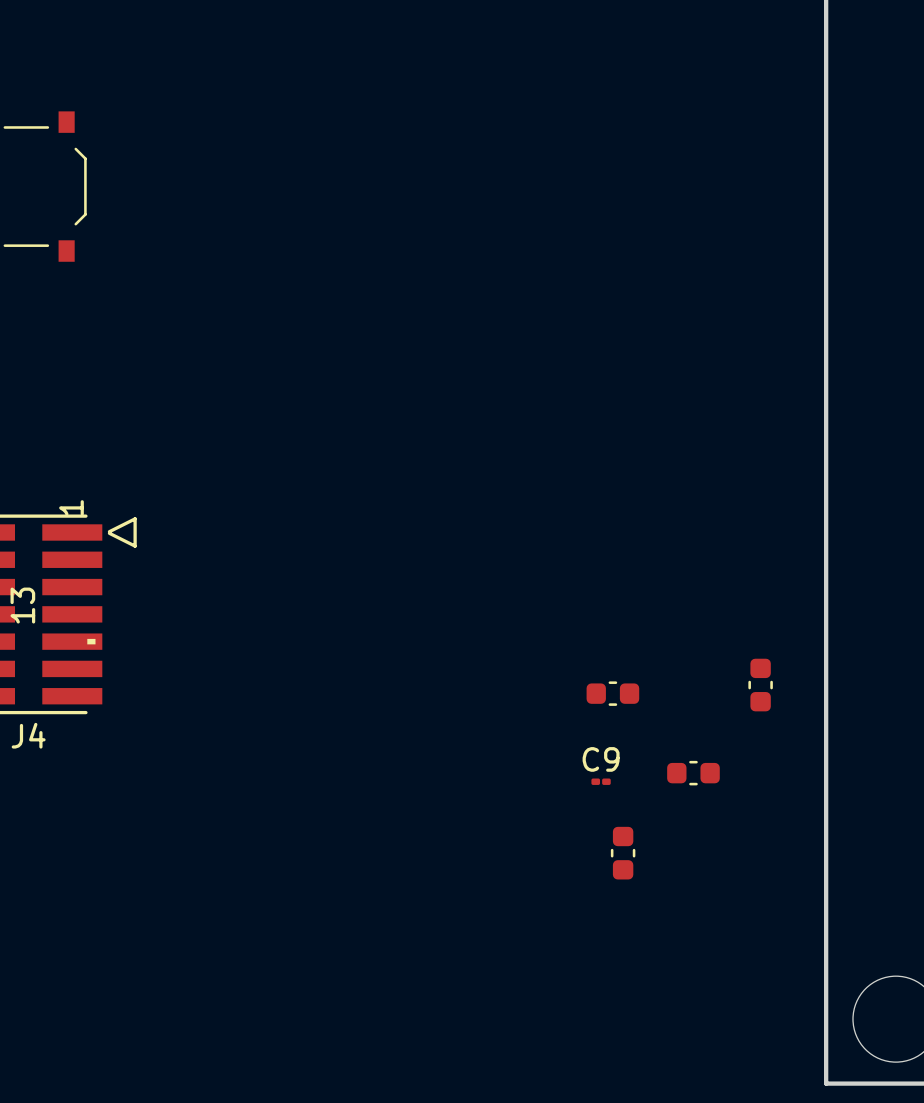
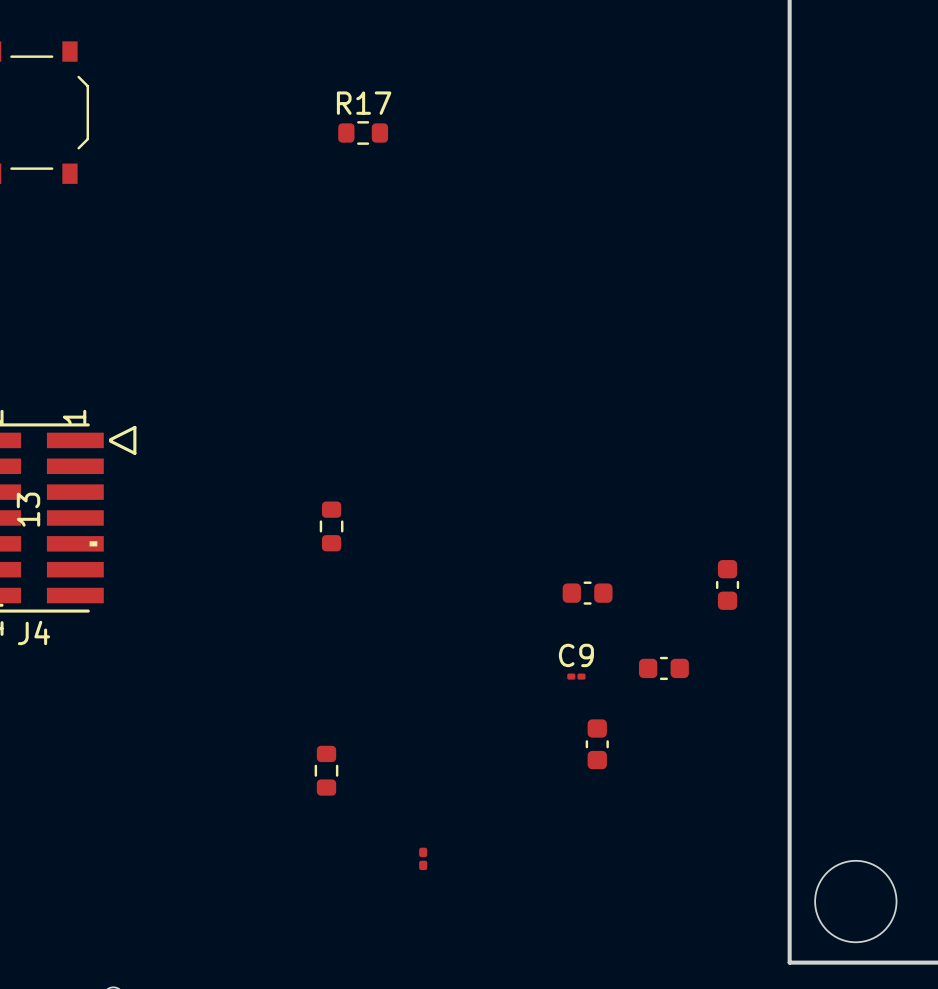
R17: none -> (363, 133)
part: none -> (331, 526)
part: none -> (326, 770)
part: none -> (423, 858)

